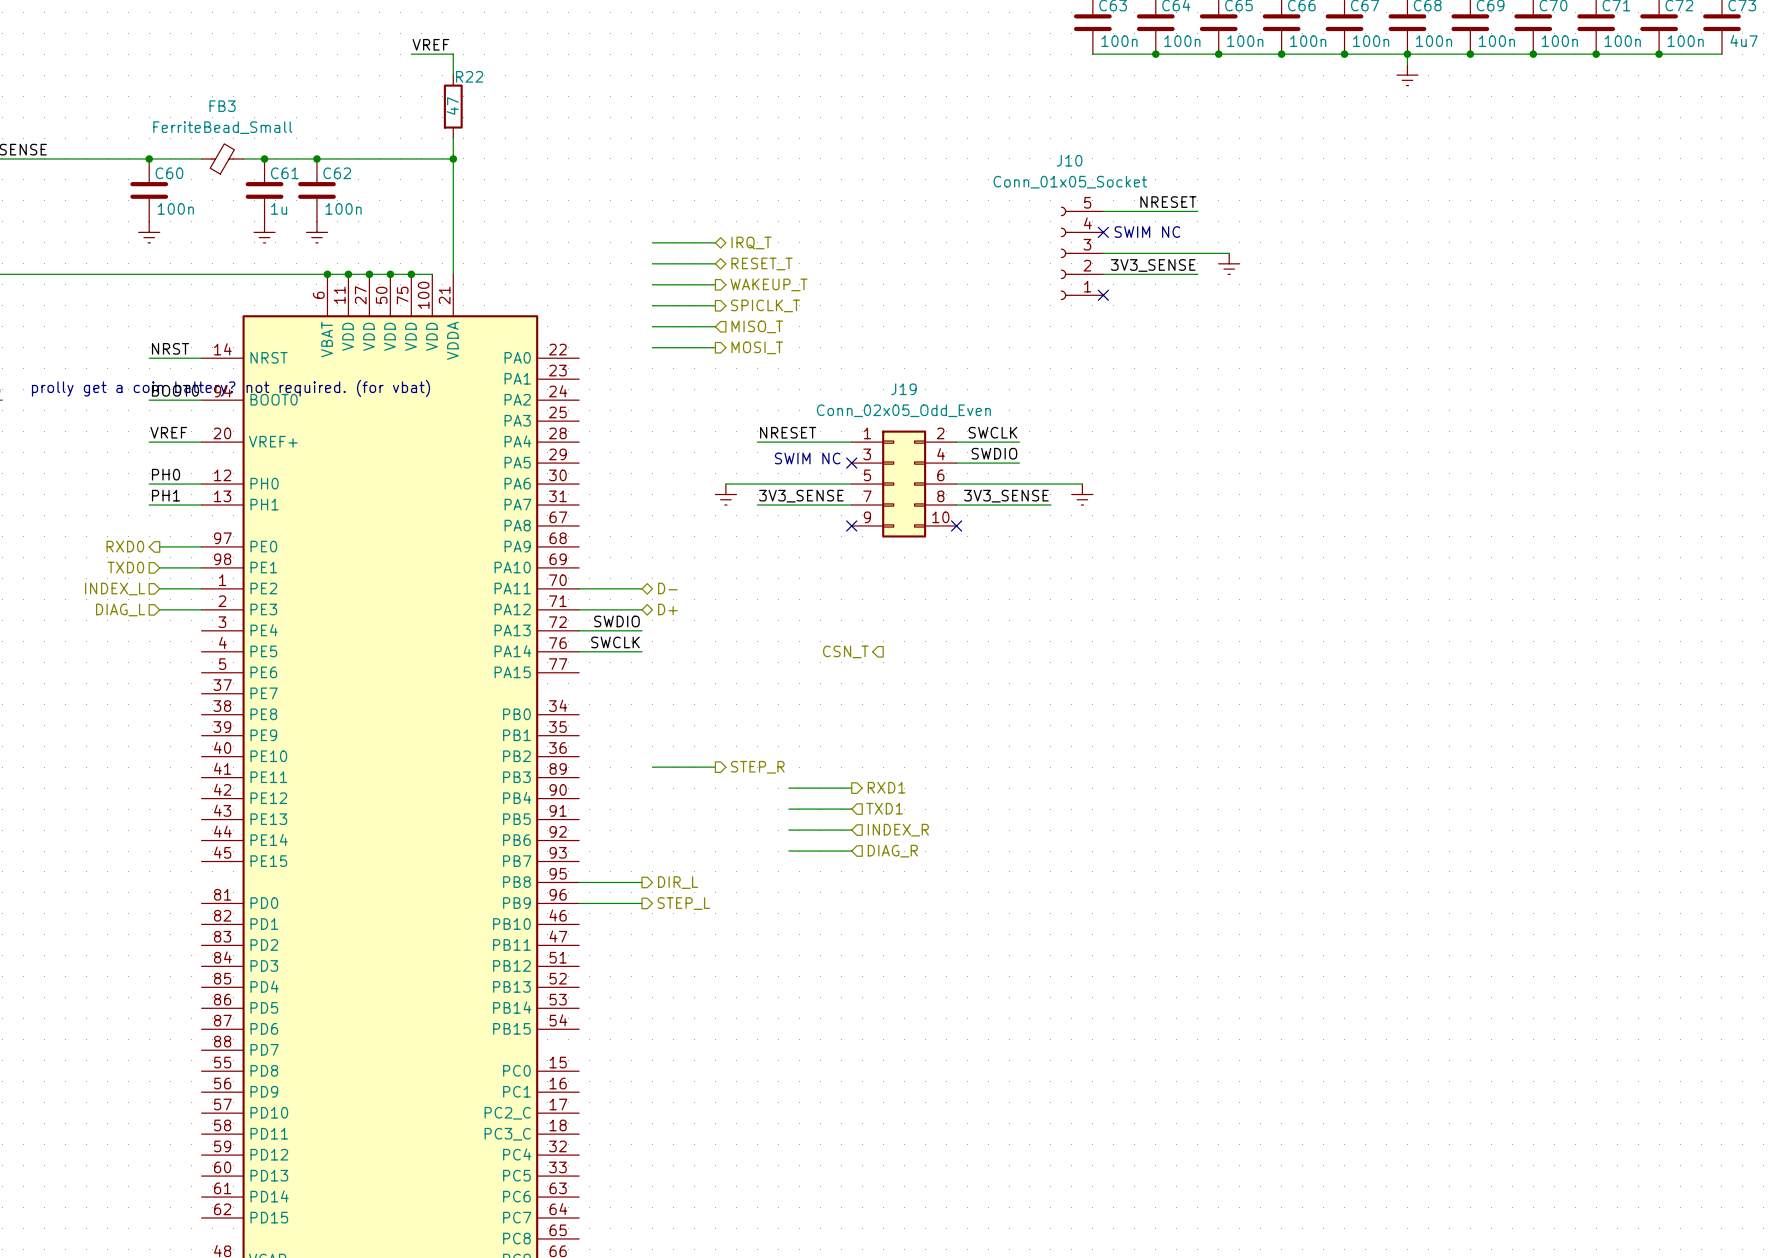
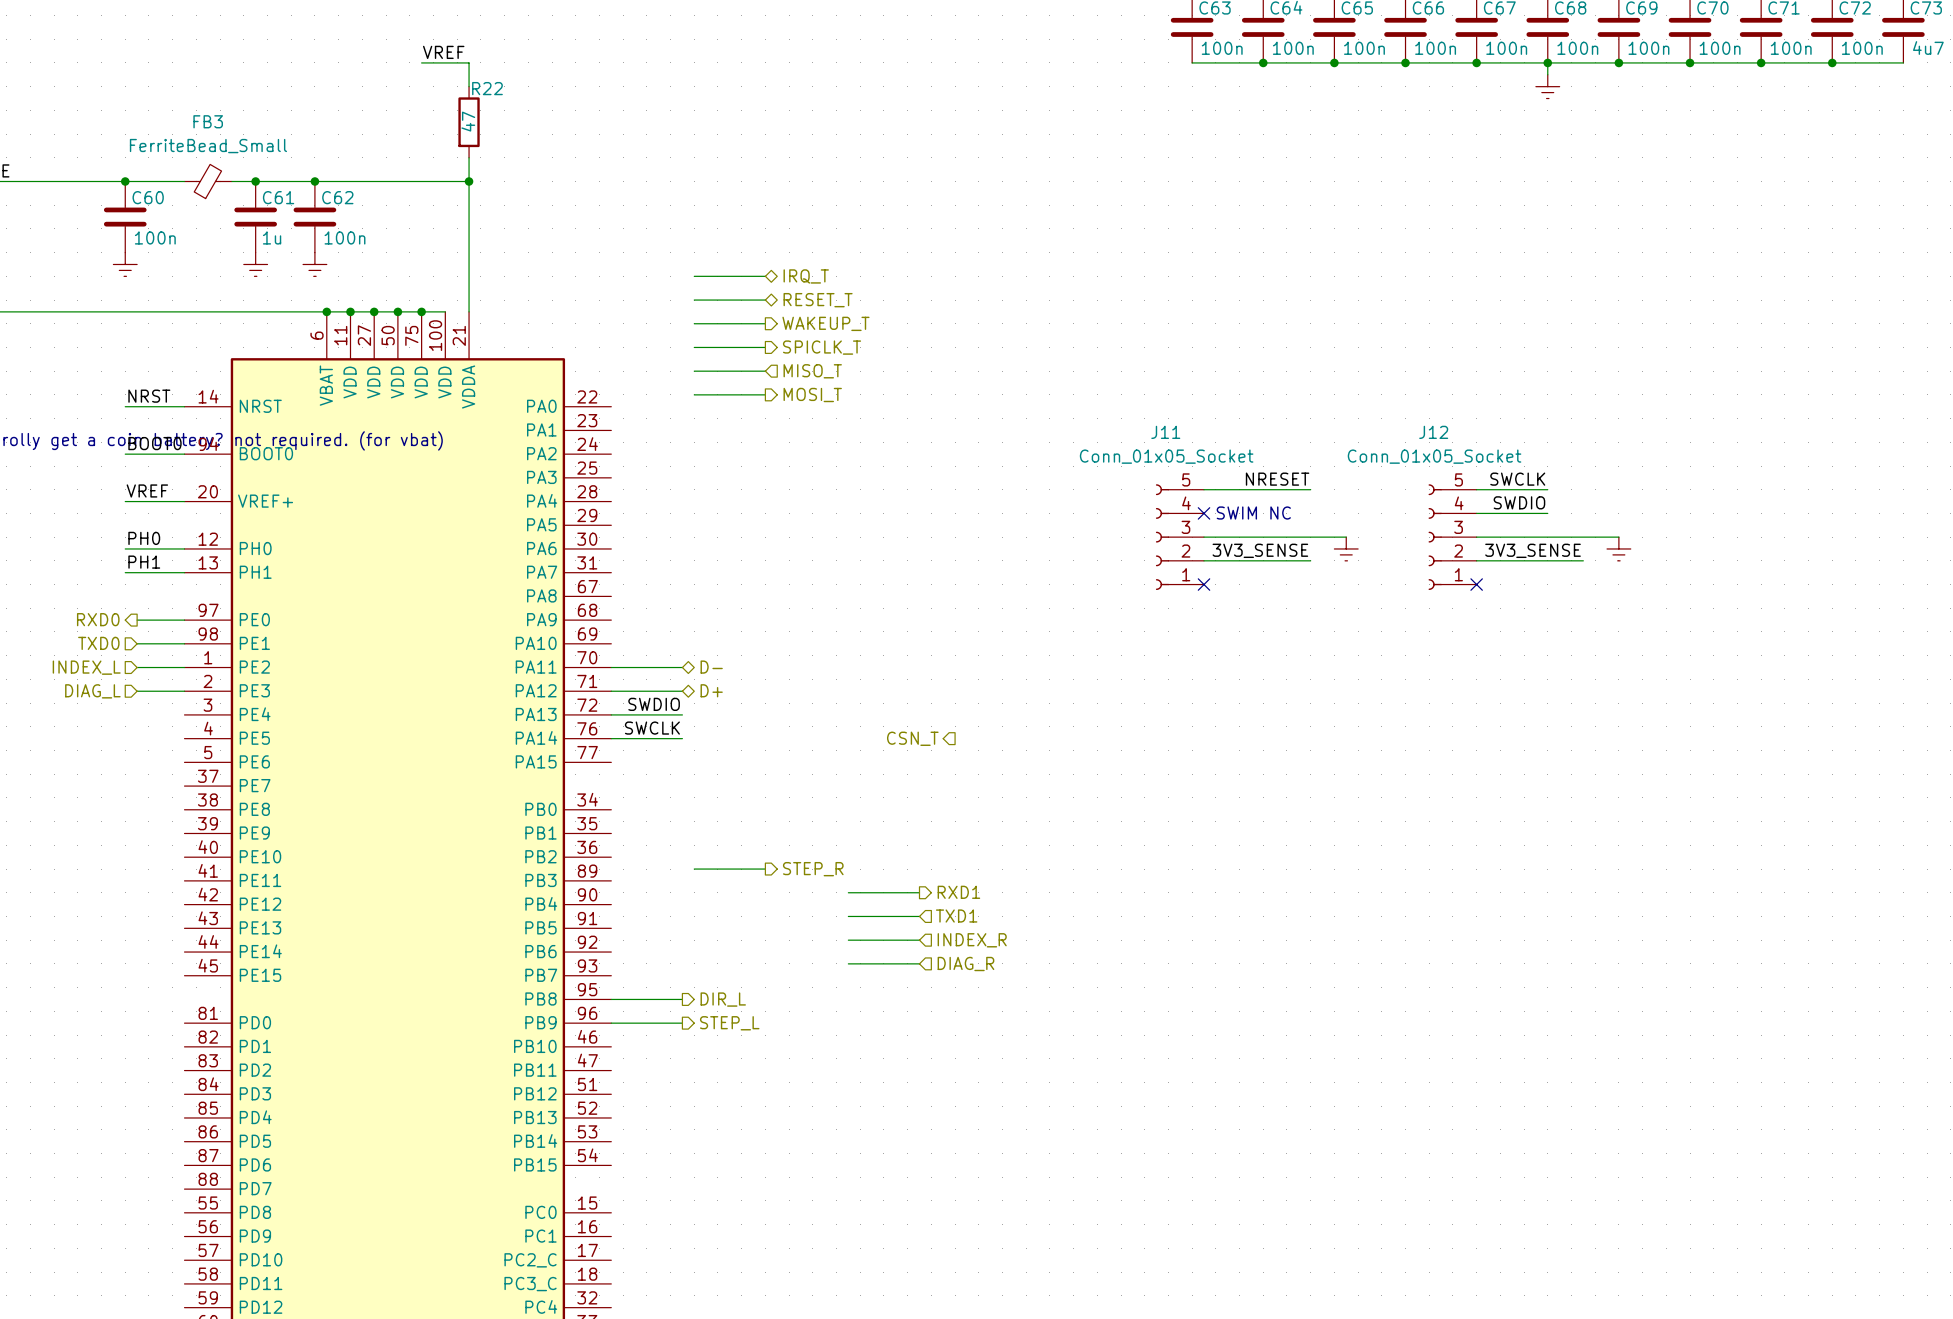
label: NRESET (1168, 202) -> none
wire: (1103, 211) (1197, 211) -> none
no-connect mark: (1103, 232) -> none
text: SWIM NC (1147, 232) -> none
J10: Conn_01x05_Socket (1082, 253) -> none
wire: (1103, 253) (1229, 253) -> none
power symbol: (1229, 263) -> none
label: 3V3_SENSE (1153, 265) -> none
wire: (1103, 274) (1197, 274) -> (1204, 489) (1310, 489)
no-connect mark: (1103, 295) -> none
label: none -> NRESET (1277, 479)
label: none -> SWCLK (1517, 479)
wire: none -> (1476, 489) (1547, 489)
label: NRESET (788, 432) -> none
label: SWCLK (992, 432) -> none
wire: (757, 442) (851, 442) -> none
wire: (956, 442) (1019, 442) -> none
label: none -> SWDIO (1519, 502)
no-connect mark: none -> (1204, 513)
text: none -> SWIM NC (1253, 513)
wire: none -> (1476, 513) (1547, 513)
label: SWDIO (994, 453) -> none
text: SWIM NC (807, 458) -> none
no-connect mark: (851, 463) -> none
wire: (956, 463) (1019, 463) -> none
J11: none -> Conn_01x05_Socket (1179, 537)
J12: none -> Conn_01x05_Socket (1452, 537)
wire: none -> (1476, 537) (1618, 537)
wire: (725, 484) (851, 484) -> none
J19: Conn_02x05_Odd_Even (904, 484) -> none
wire: (956, 484) (1082, 484) -> (1204, 537) (1346, 537)
power symbol: none -> (1346, 548)
power symbol: none -> (1618, 548)
label: none -> 3V3_SENSE (1260, 550)
label: none -> 3V3_SENSE (1533, 550)
power symbol: (725, 494) -> none
power symbol: (1082, 494) -> none
wire: none -> (1476, 560) (1583, 560)
label: 3V3_SENSE (801, 496) -> none
label: 3V3_SENSE (1006, 496) -> none
wire: (757, 505) (851, 505) -> none
wire: (956, 505) (1050, 505) -> (1204, 560) (1310, 560)
no-connect mark: none -> (1204, 584)
no-connect mark: none -> (1476, 584)
no-connect mark: (851, 525) -> none
no-connect mark: (956, 525) -> none

